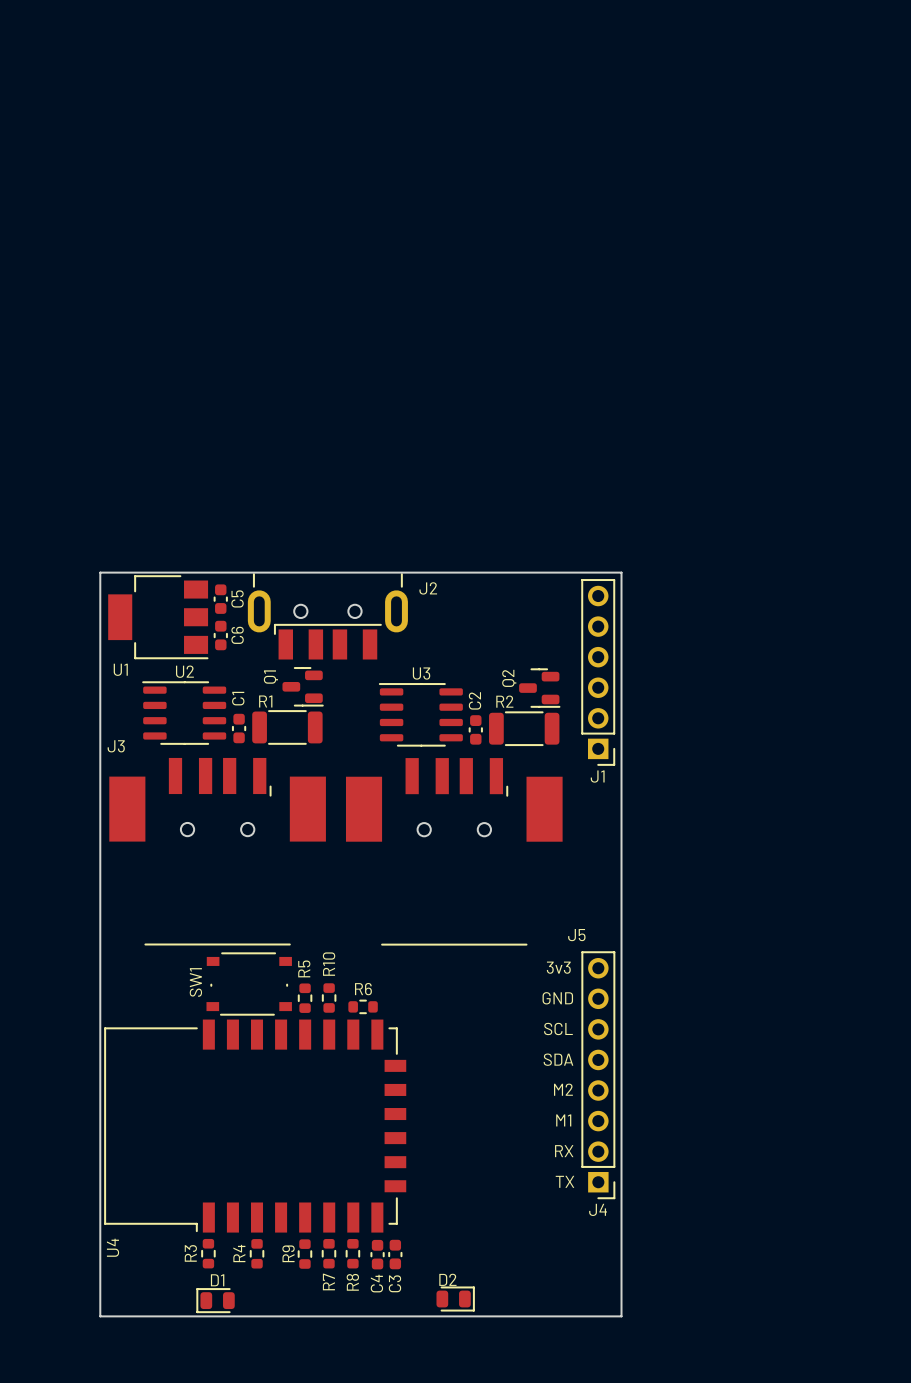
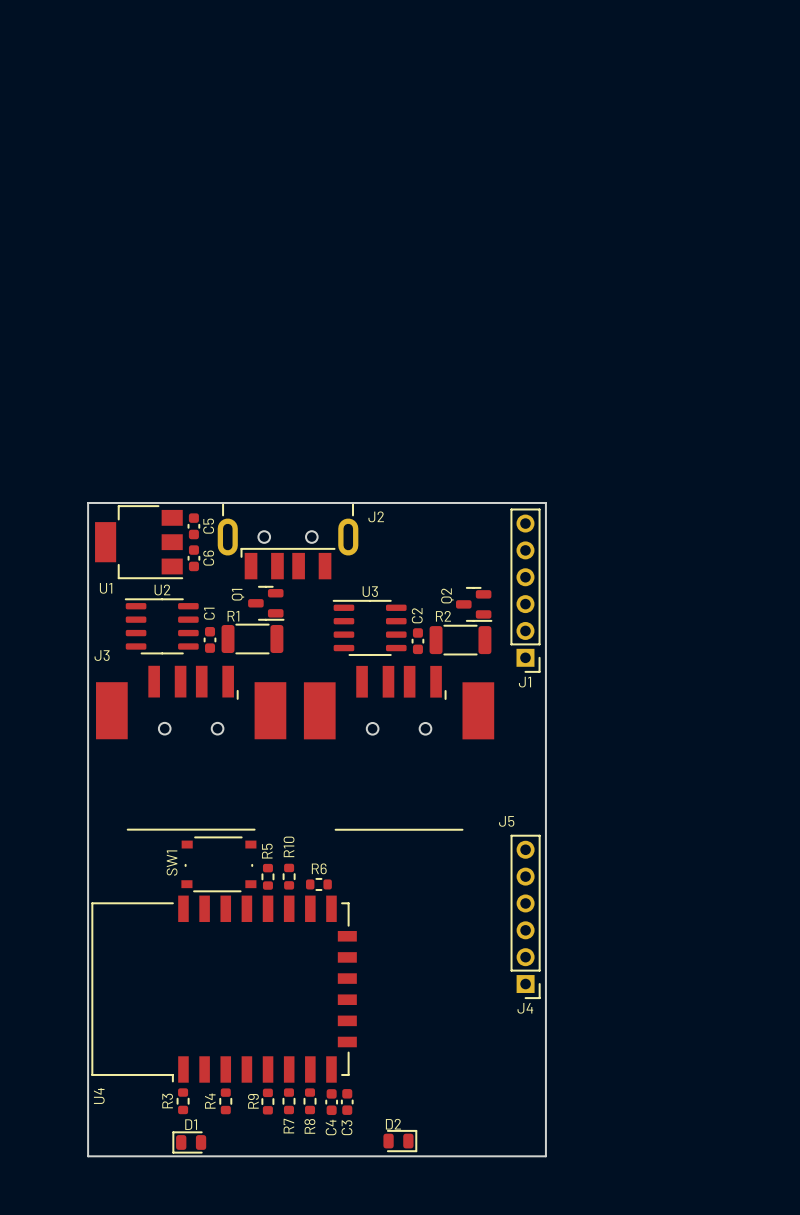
J4 footprint: [581, 951, 616, 1199] -> [510, 835, 541, 999]
text: 3v3 (558, 967) -> none
text: GND (557, 998) -> none
text: SCL (558, 1028) -> none
text: SDA (558, 1059) -> none
text: M2 (563, 1089) -> none
text: M1 (563, 1120) -> none
text: RX (564, 1151) -> none
text: TX (564, 1181) -> none
J4 name position: J4 (598, 1209) -> J4 (525, 1008)

